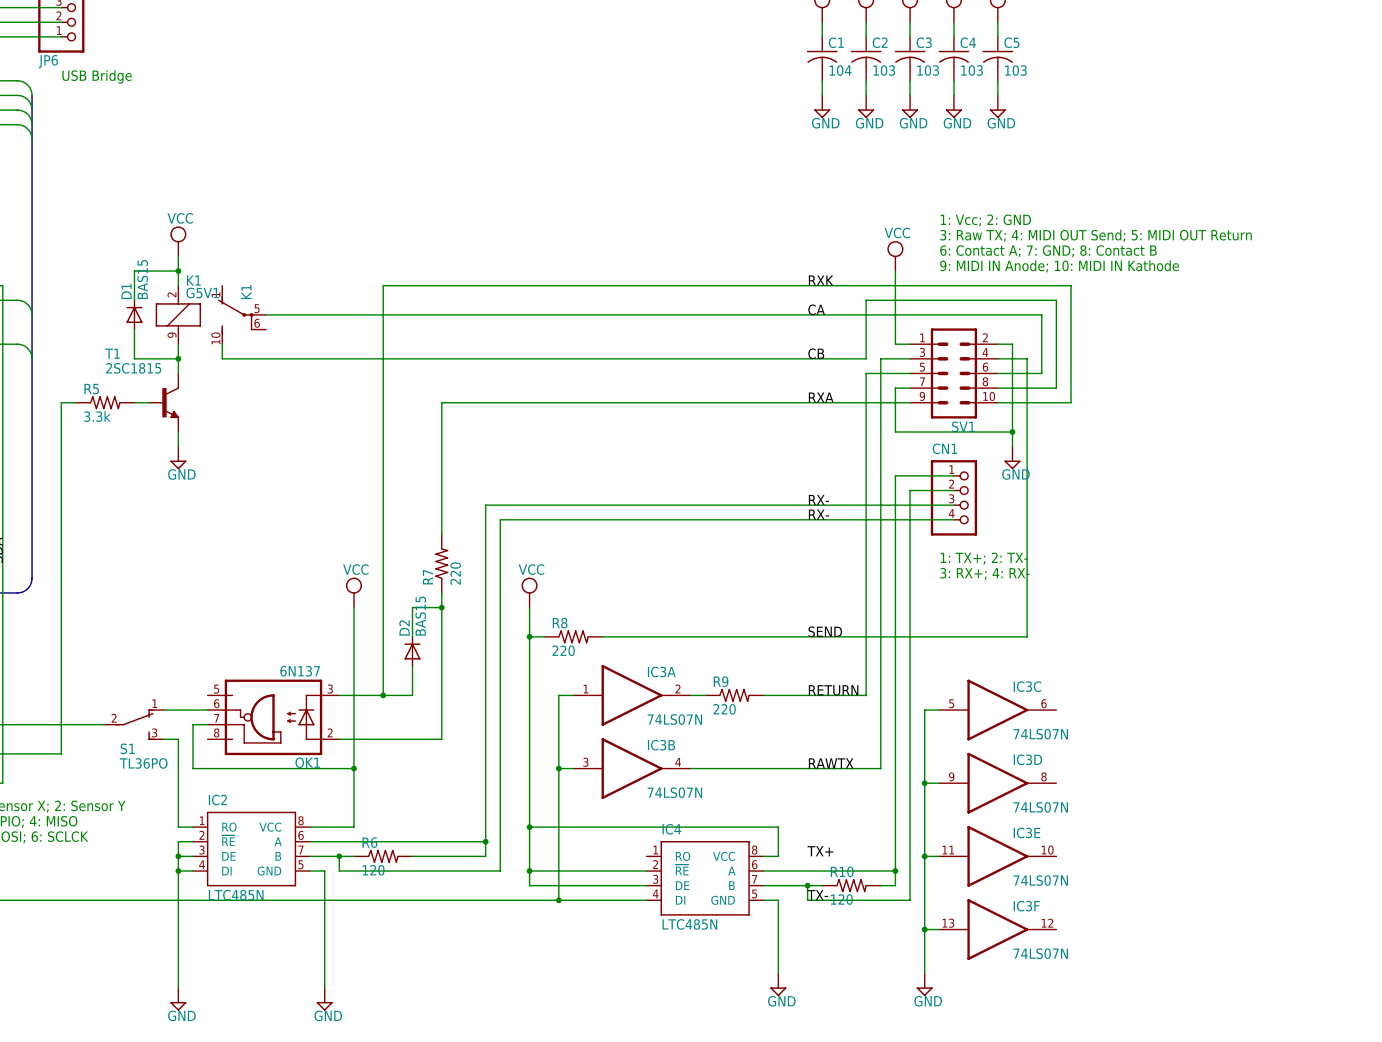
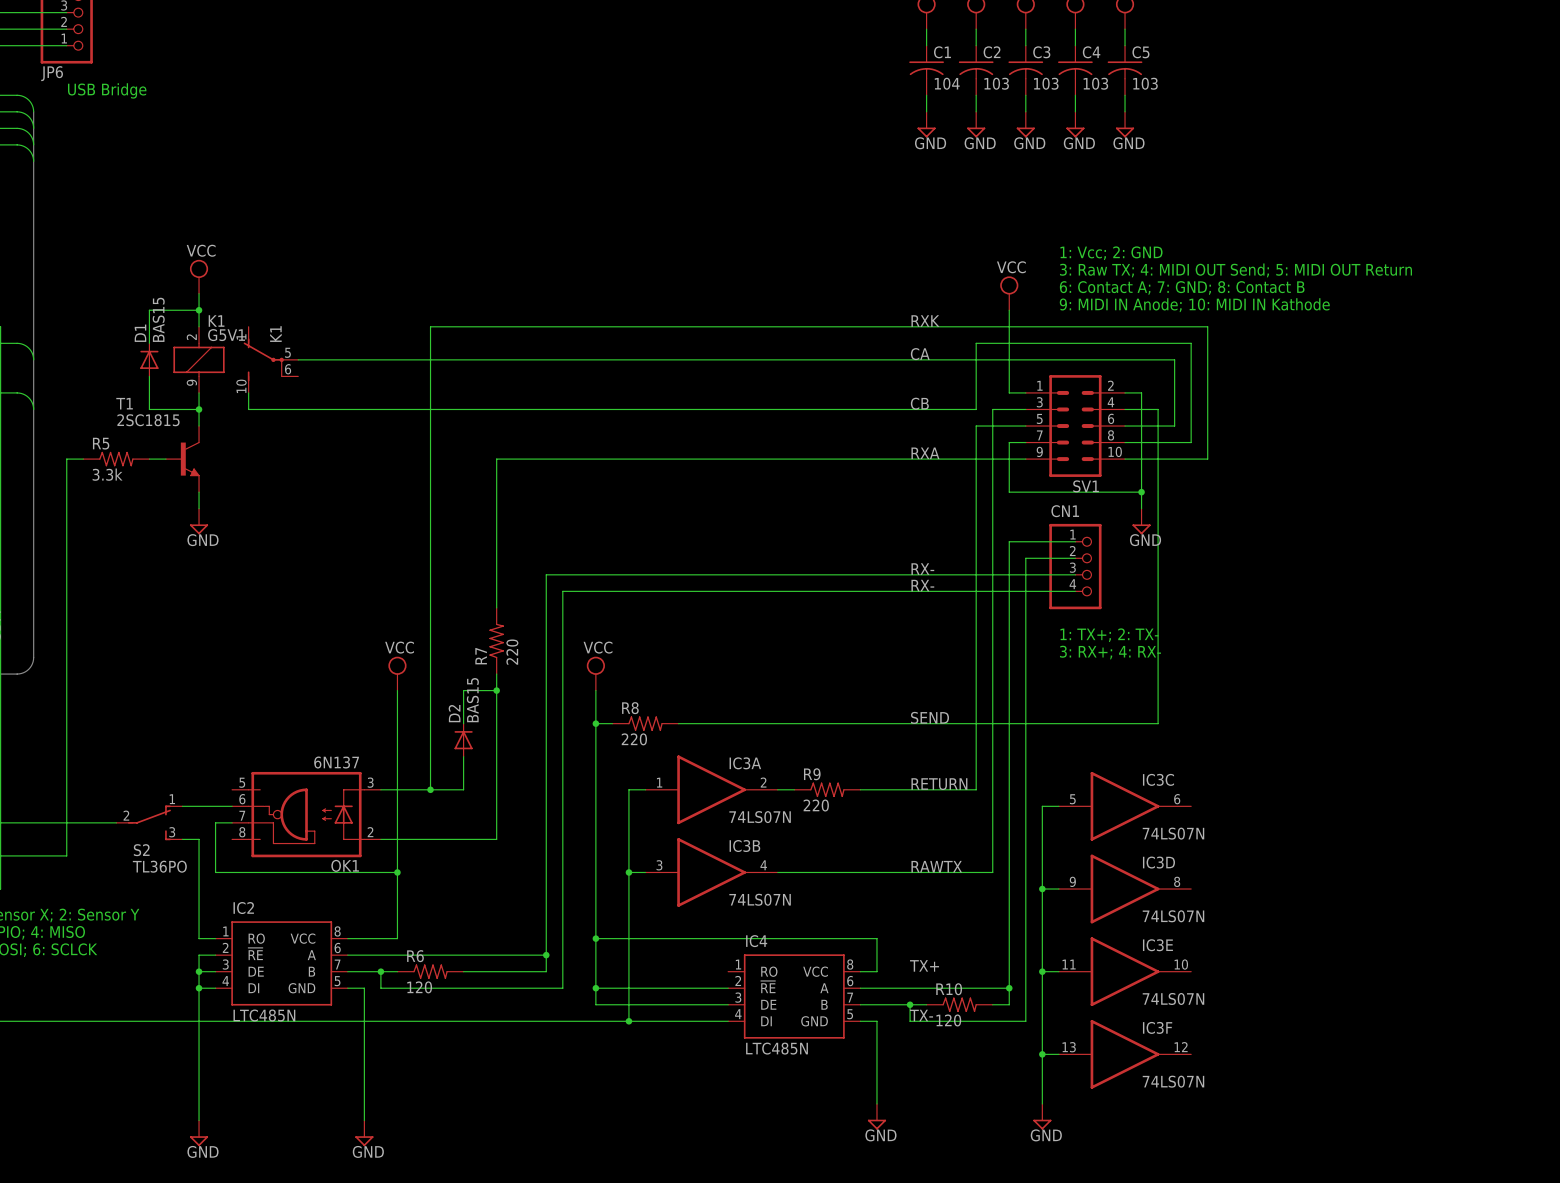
S1 name: S1 (127, 748) -> S2 (141, 850)

